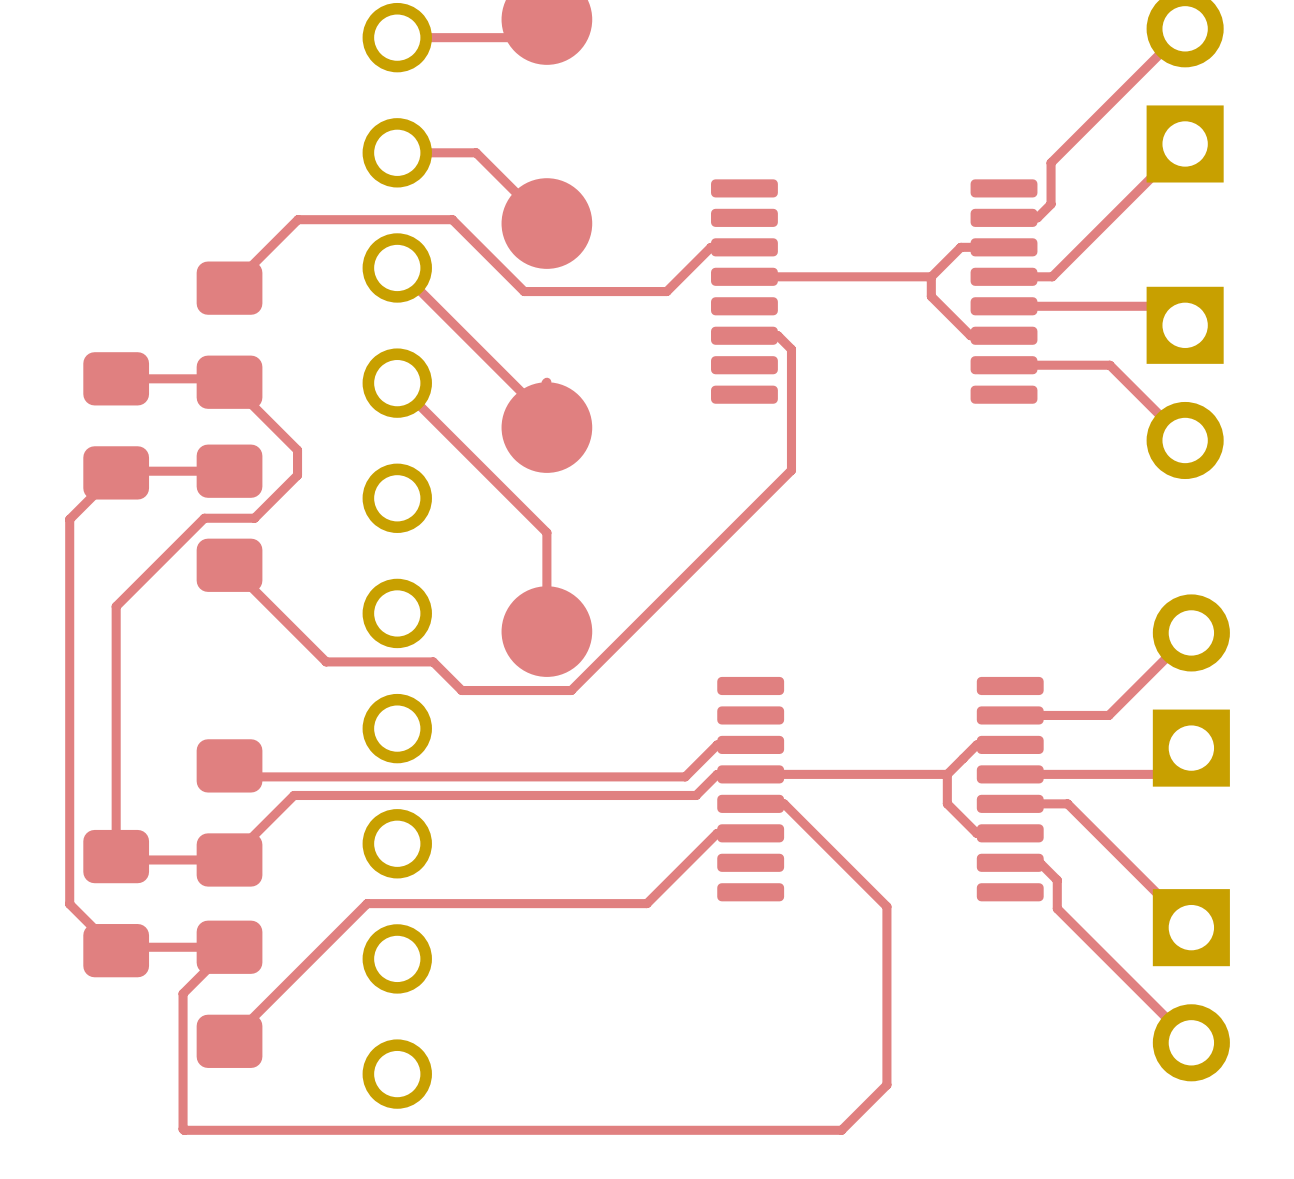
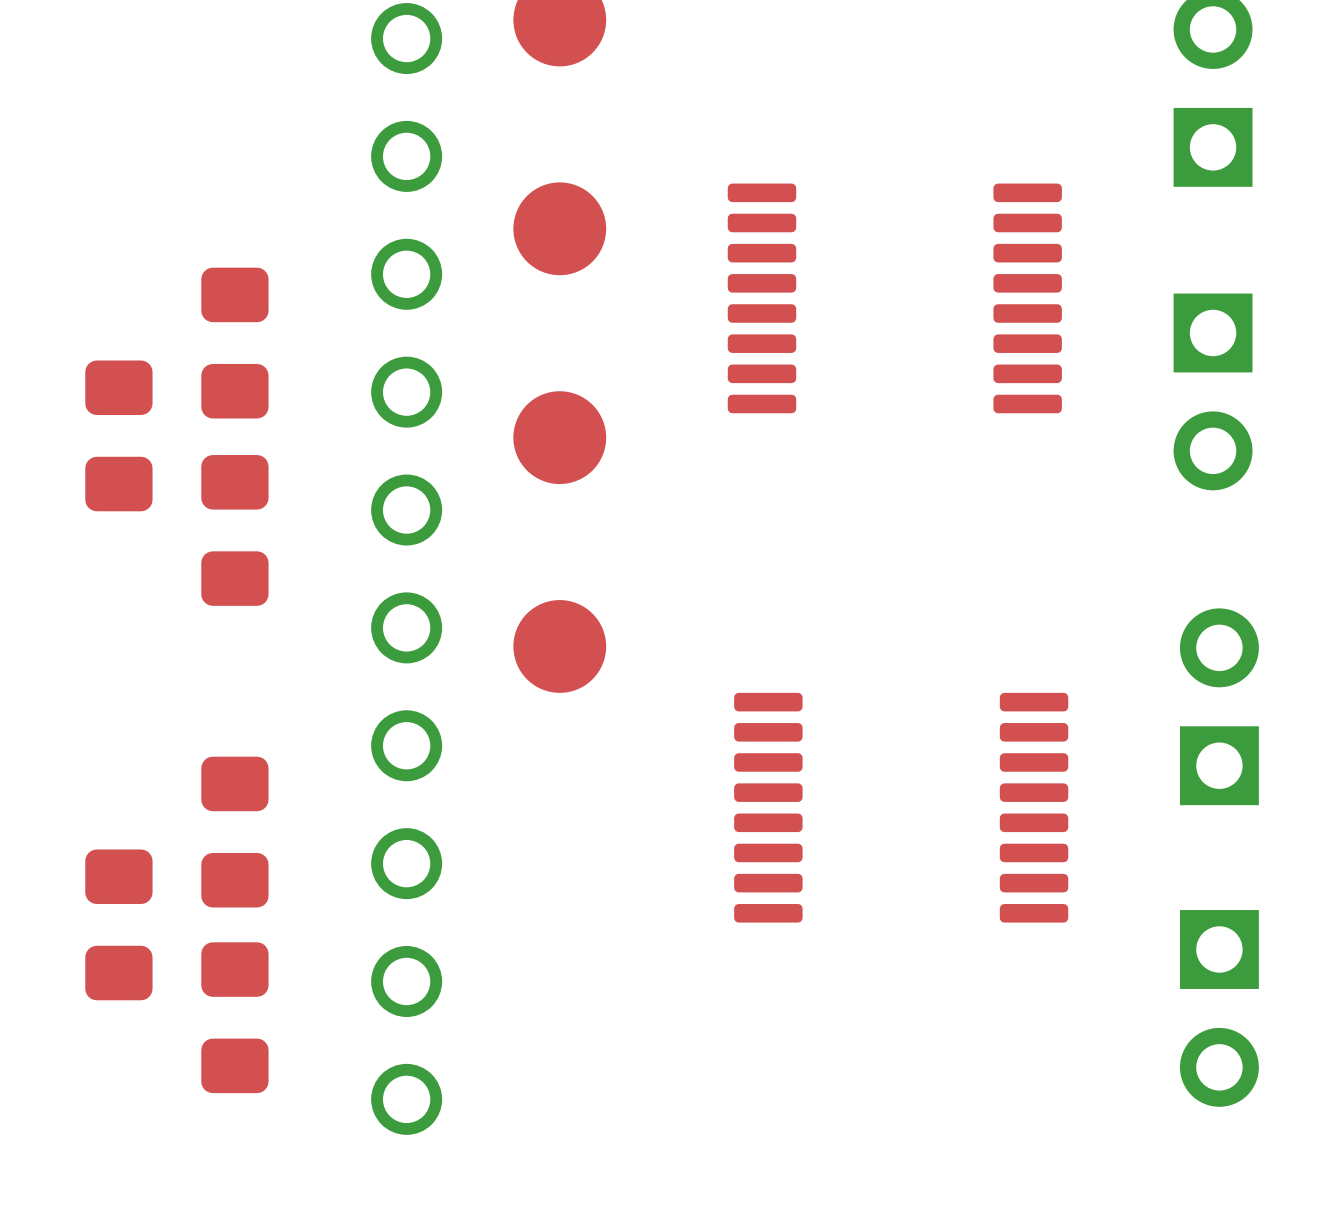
top track: (546, 19) (528, 37) (397, 37) -> none
top track: (1185, 28) (1051, 162) (1051, 204) (1037, 217) (1004, 217) -> none
top track: (1185, 143) (1052, 276) (1004, 276) -> none
top track: (397, 152) (476, 152) (546, 223) -> none
top track: (744, 247) (711, 247) (666, 291) (524, 291) (452, 219) (297, 219) (229, 288) -> none
top track: (1004, 247) (960, 247) (931, 276) -> none
top track: (397, 267) (546, 417) (546, 427) -> none
top track: (931, 276) (744, 276) -> none
top track: (931, 276) (931, 296) (970, 335) (1004, 335) -> none
top track: (1004, 306) (1166, 306) (1185, 325) -> none
top track: (744, 335) (777, 335) (791, 349) (791, 470) (571, 690) (461, 690) (433, 661) (326, 661) (229, 565) -> none
top track: (1004, 365) (1109, 365) (1185, 440) -> none
top track: (116, 378) (226, 378) (297, 450) (297, 475) (254, 518) (204, 518) (116, 606) (116, 856) (119, 859) (229, 859) (294, 795) (696, 795) (717, 774) (947, 774) -> none
top track: (546, 382) (545, 383) -> none
top track: (397, 383) (546, 532) (546, 631) -> none
top track: (229, 471) (117, 471) (69, 519) (69, 904) (116, 950) (119, 947) (229, 947) (183, 993) (184, 1130) (841, 1130) (886, 1084) (886, 906) (784, 803) (750, 803) -> none
top track: (1191, 632) (1108, 715) (1010, 715) -> none
top track: (750, 744) (717, 744) (685, 776) (240, 776) (229, 765) -> none
top track: (1010, 744) (976, 744) (947, 774) -> none
top track: (1191, 748) (1165, 774) (1010, 774) -> none
top track: (947, 774) (947, 803) (976, 833) (1010, 833) -> none
top track: (1010, 803) (1067, 803) (1191, 927) -> none
top track: (750, 833) (717, 833) (646, 903) (367, 903) (229, 1041) -> none
top track: (1010, 862) (1039, 862) (1057, 880) (1057, 908) (1191, 1042) -> none

